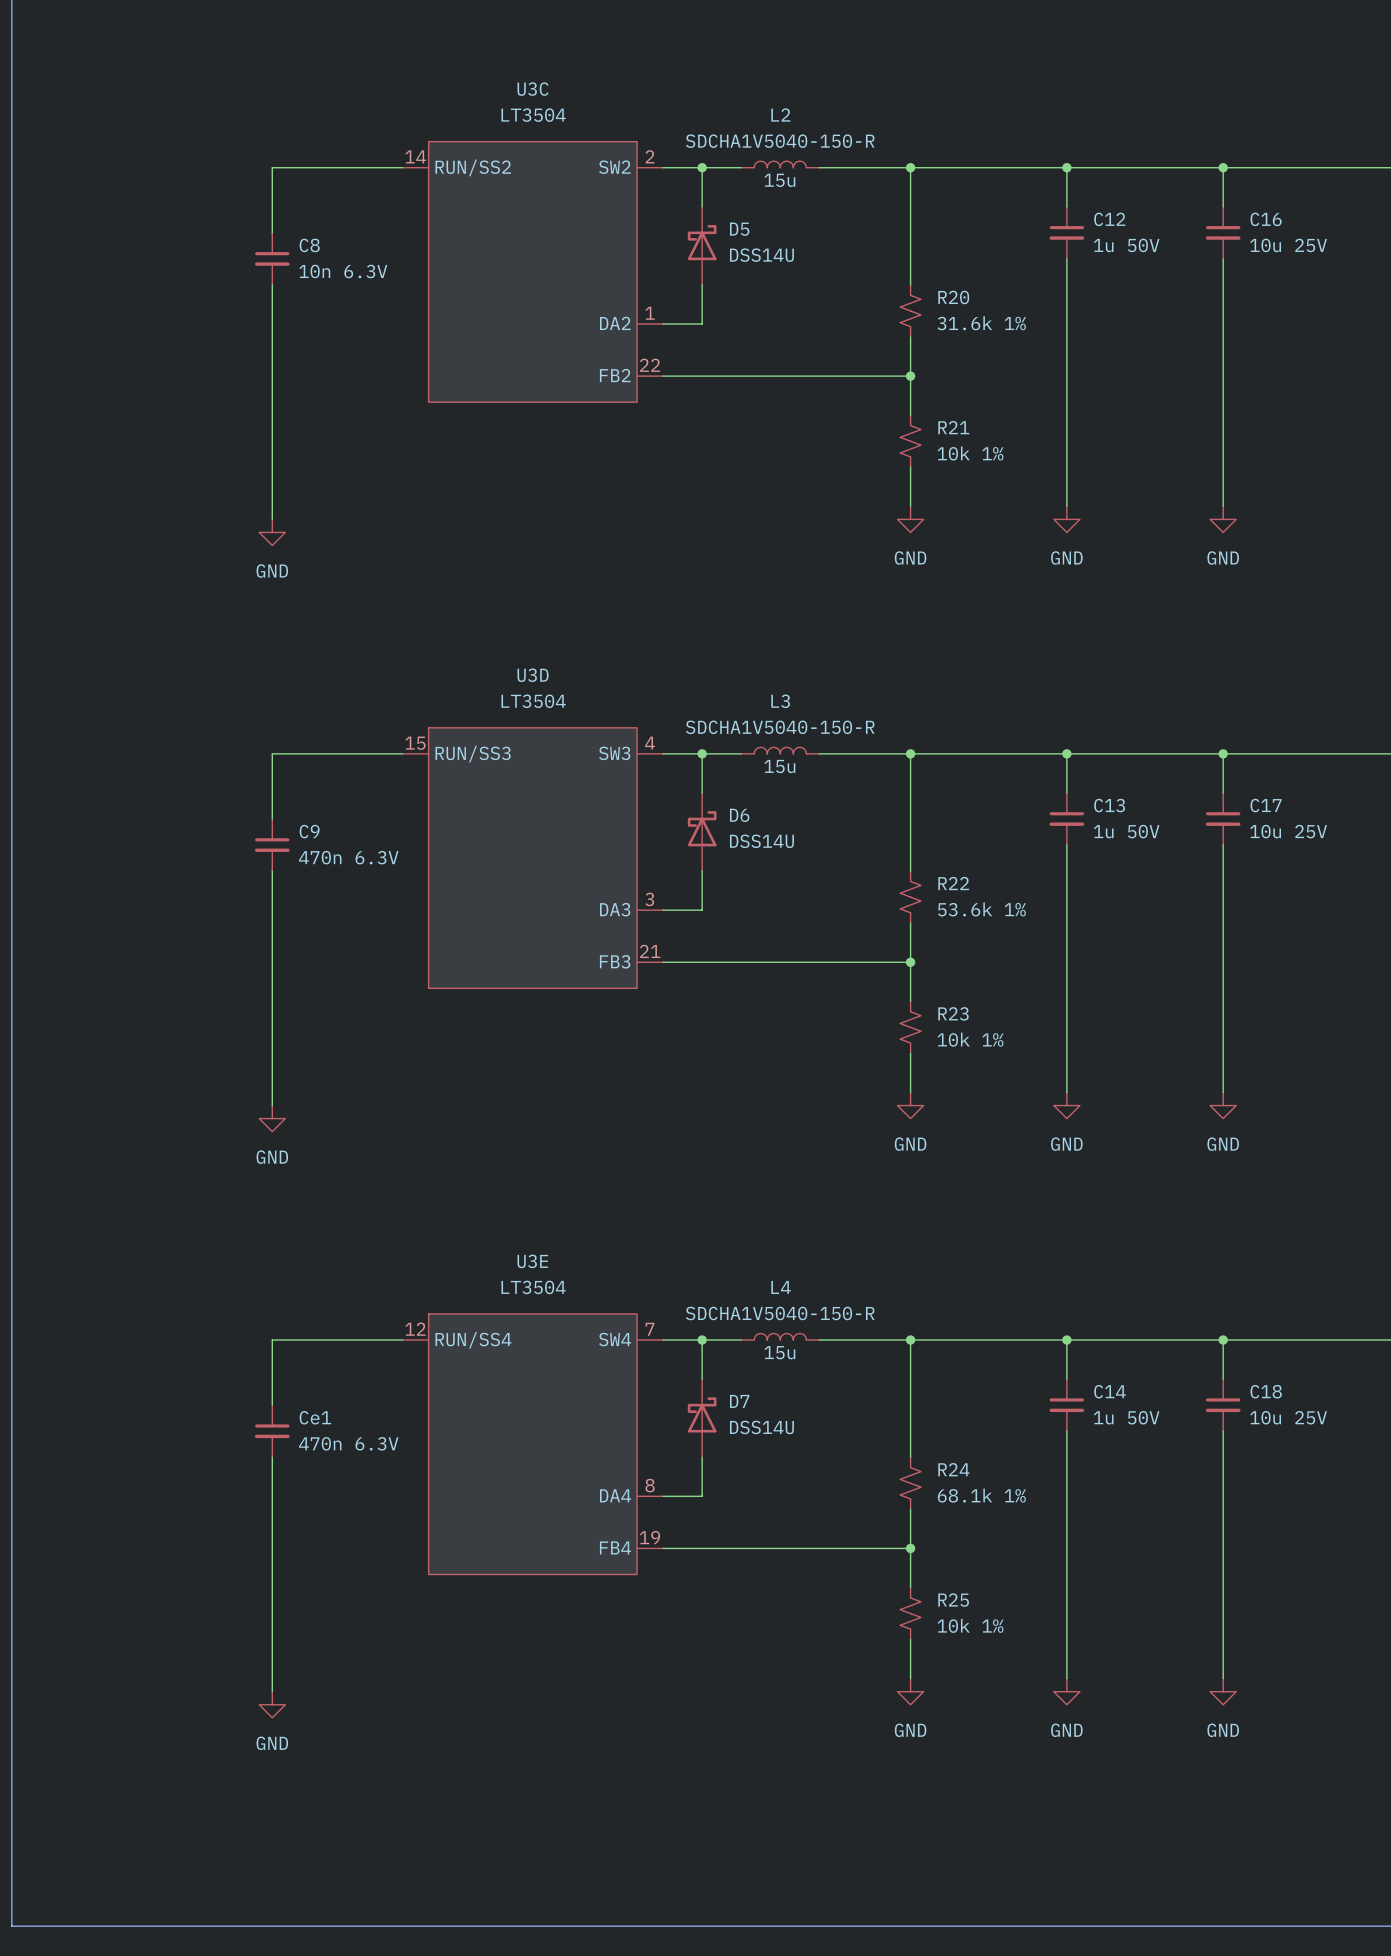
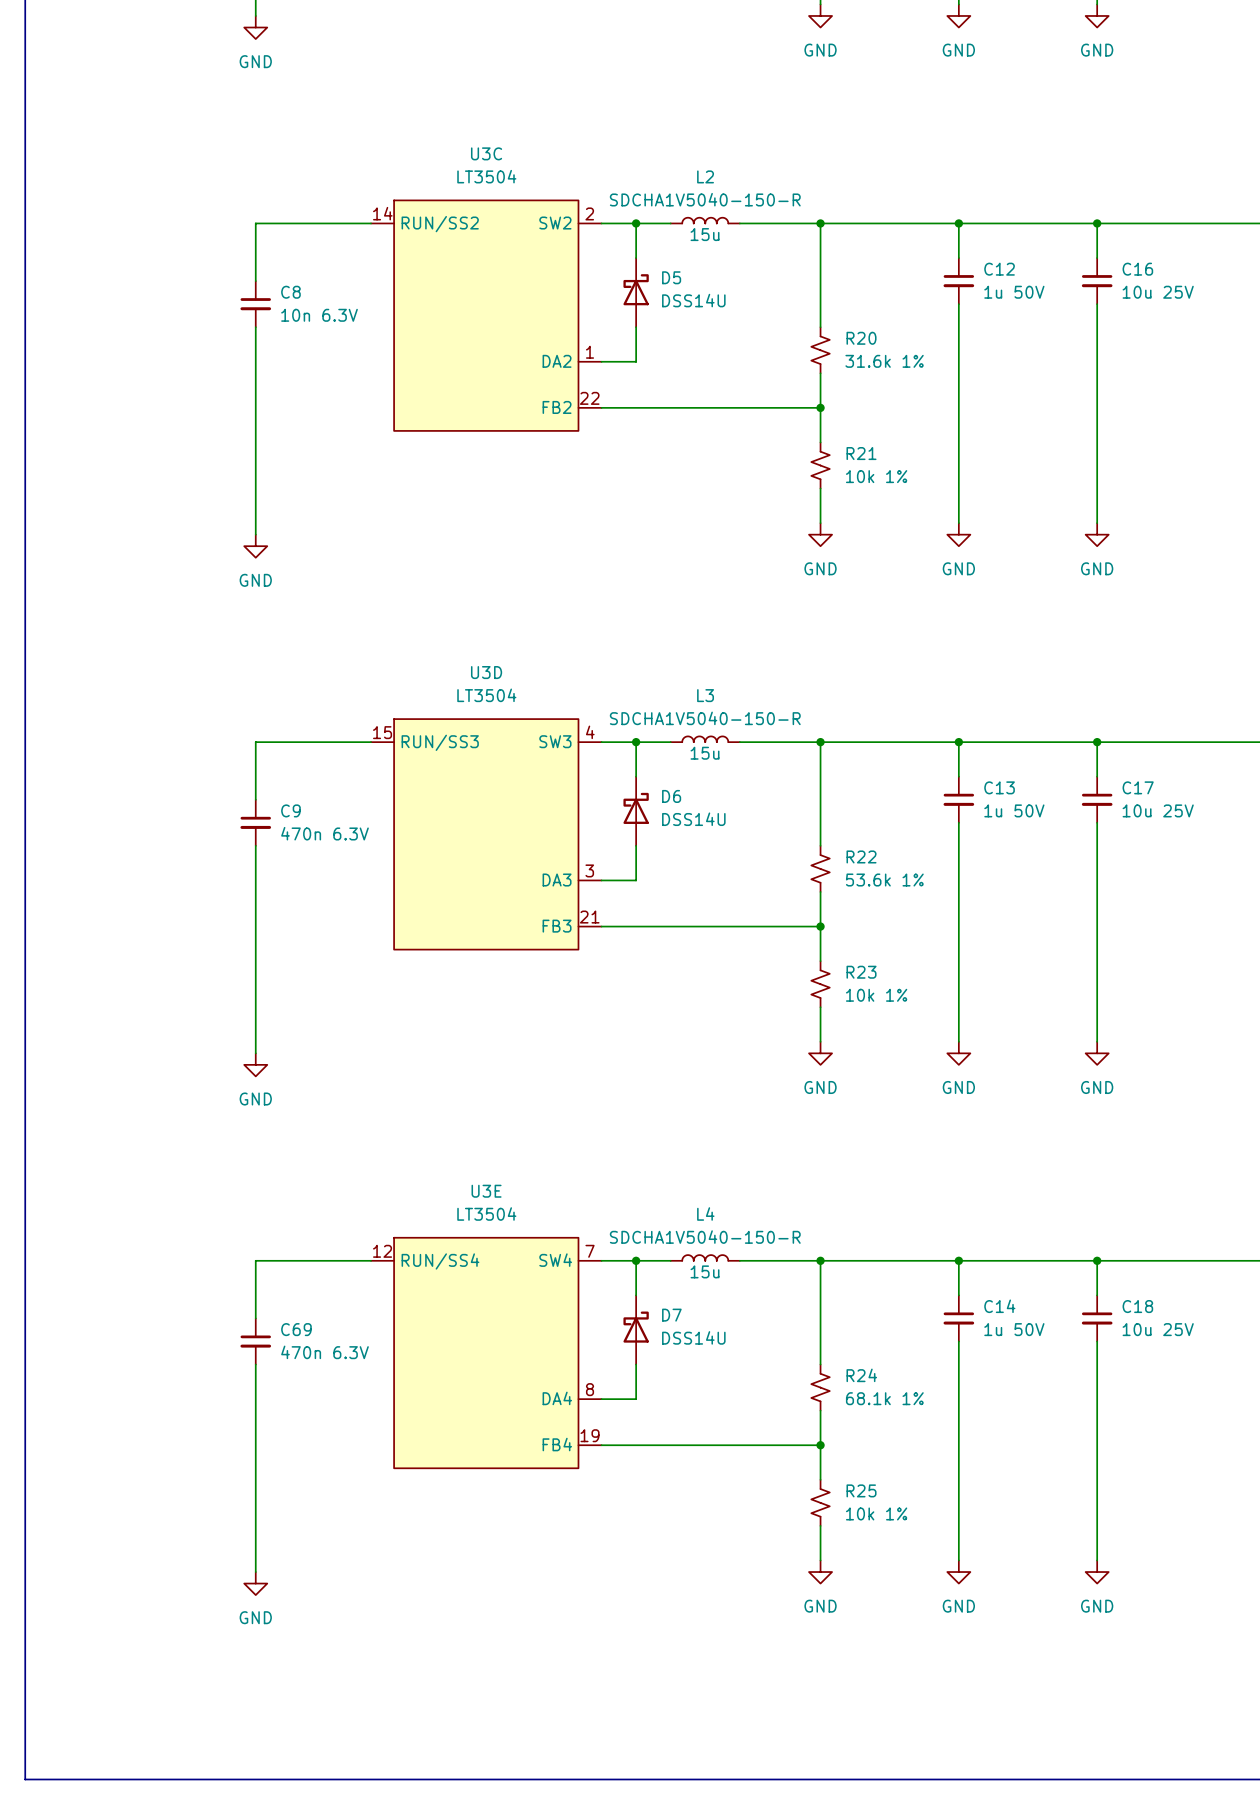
Ce1 name: Ce1 (315, 1417) -> C69 (296, 1329)

